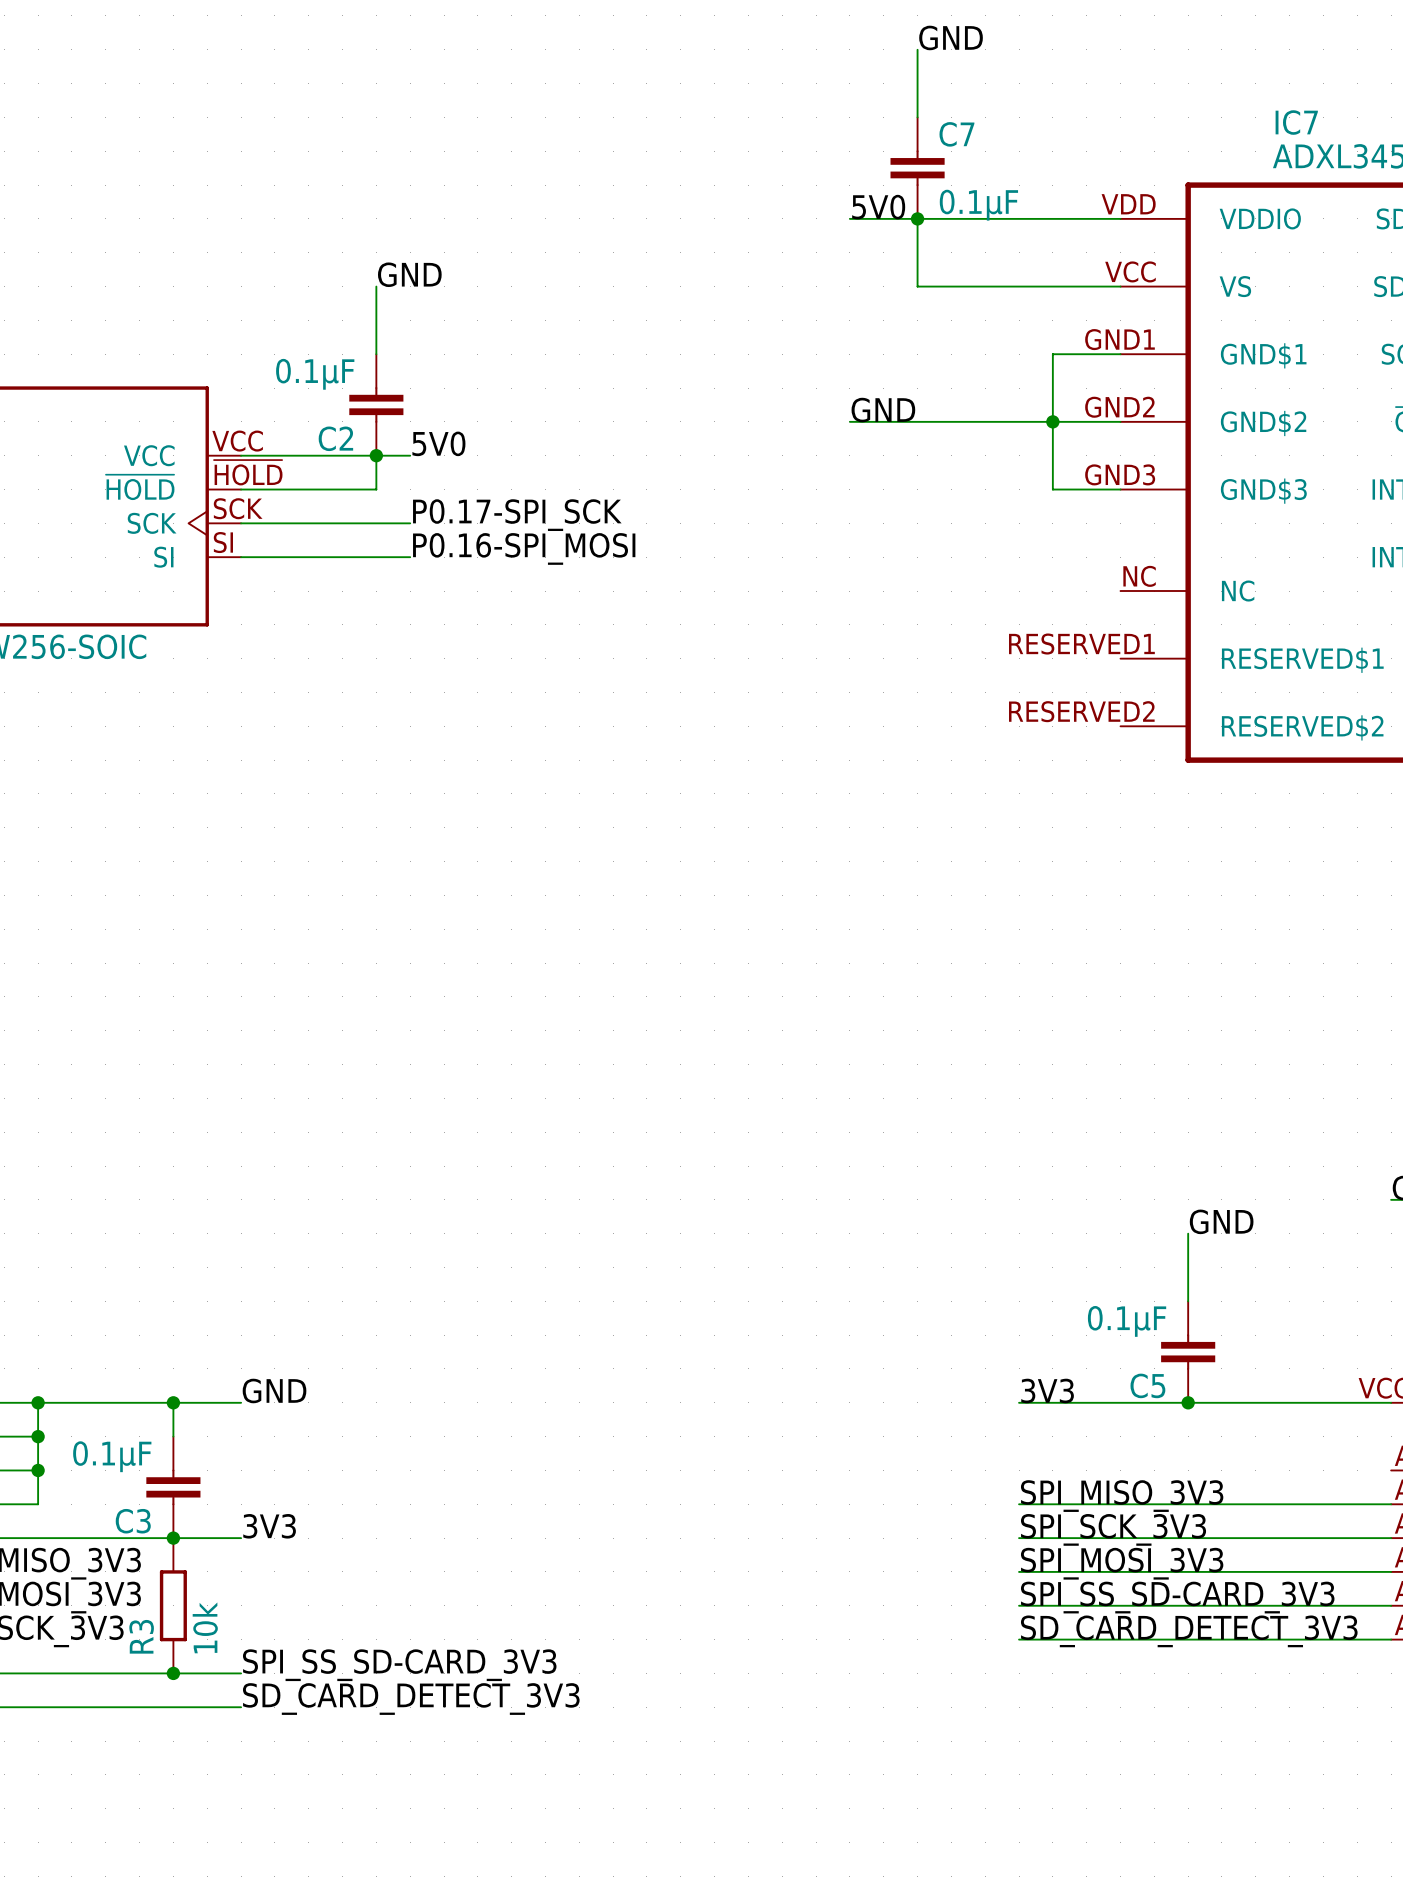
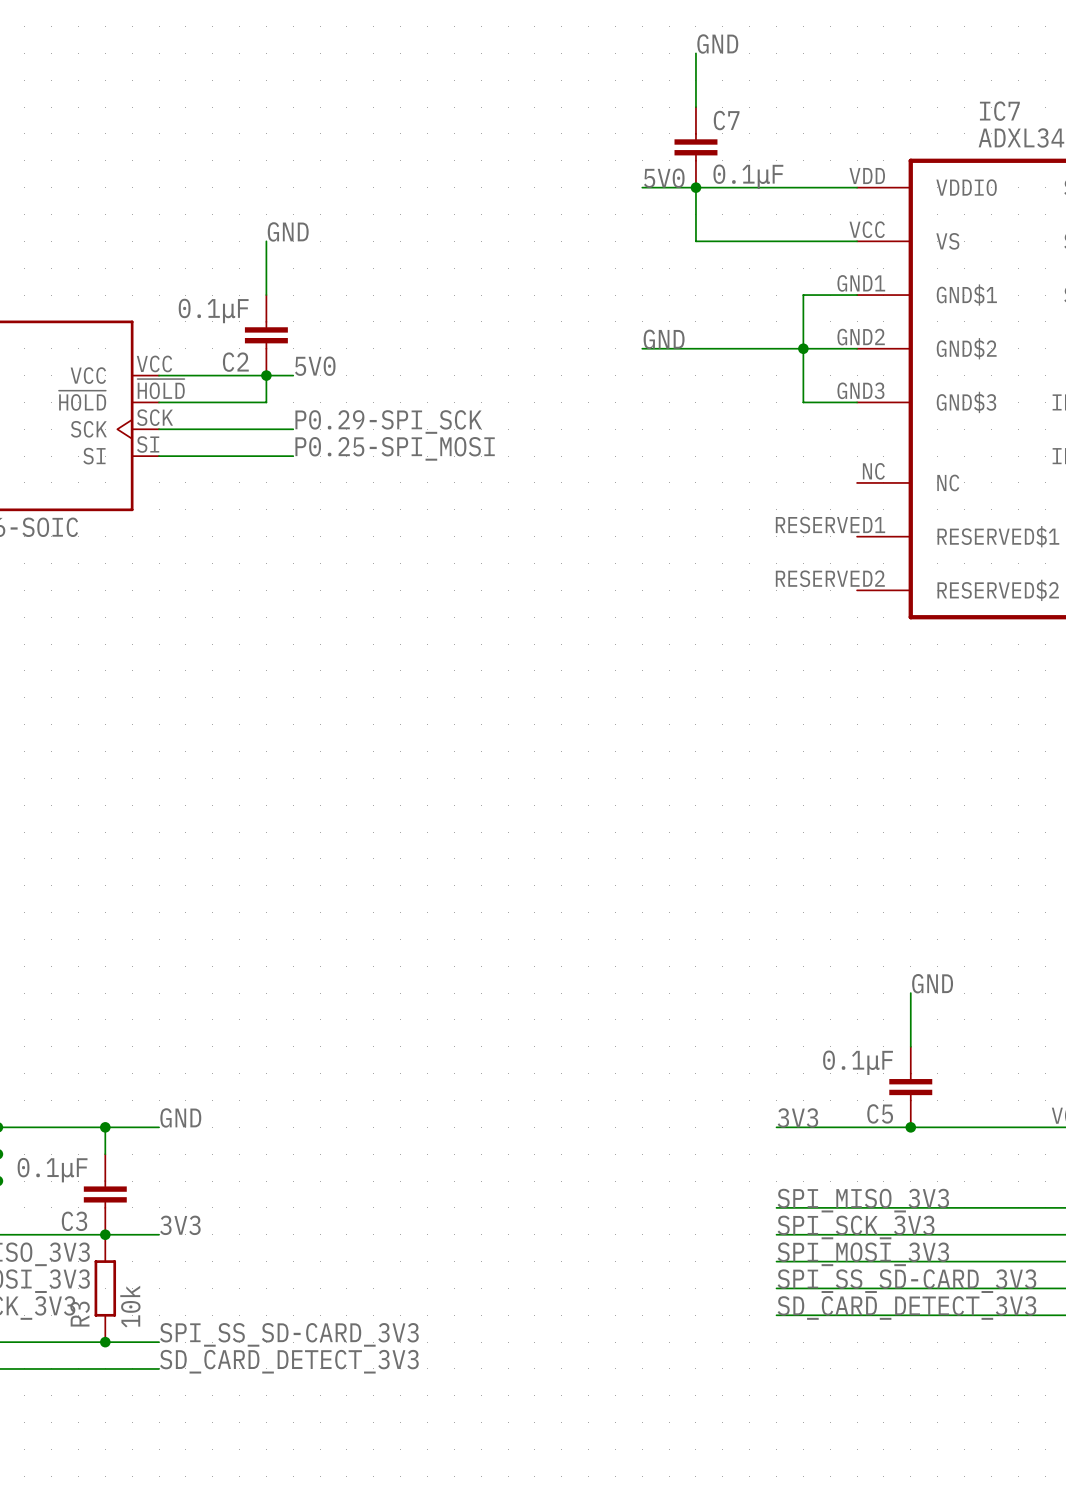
label: P0.17-SPI_SCK (517, 515) -> P0.29-SPI_SCK (388, 421)
label: P0.16-SPI_MOSI (524, 548) -> P0.25-SPI_MOSI (395, 448)

